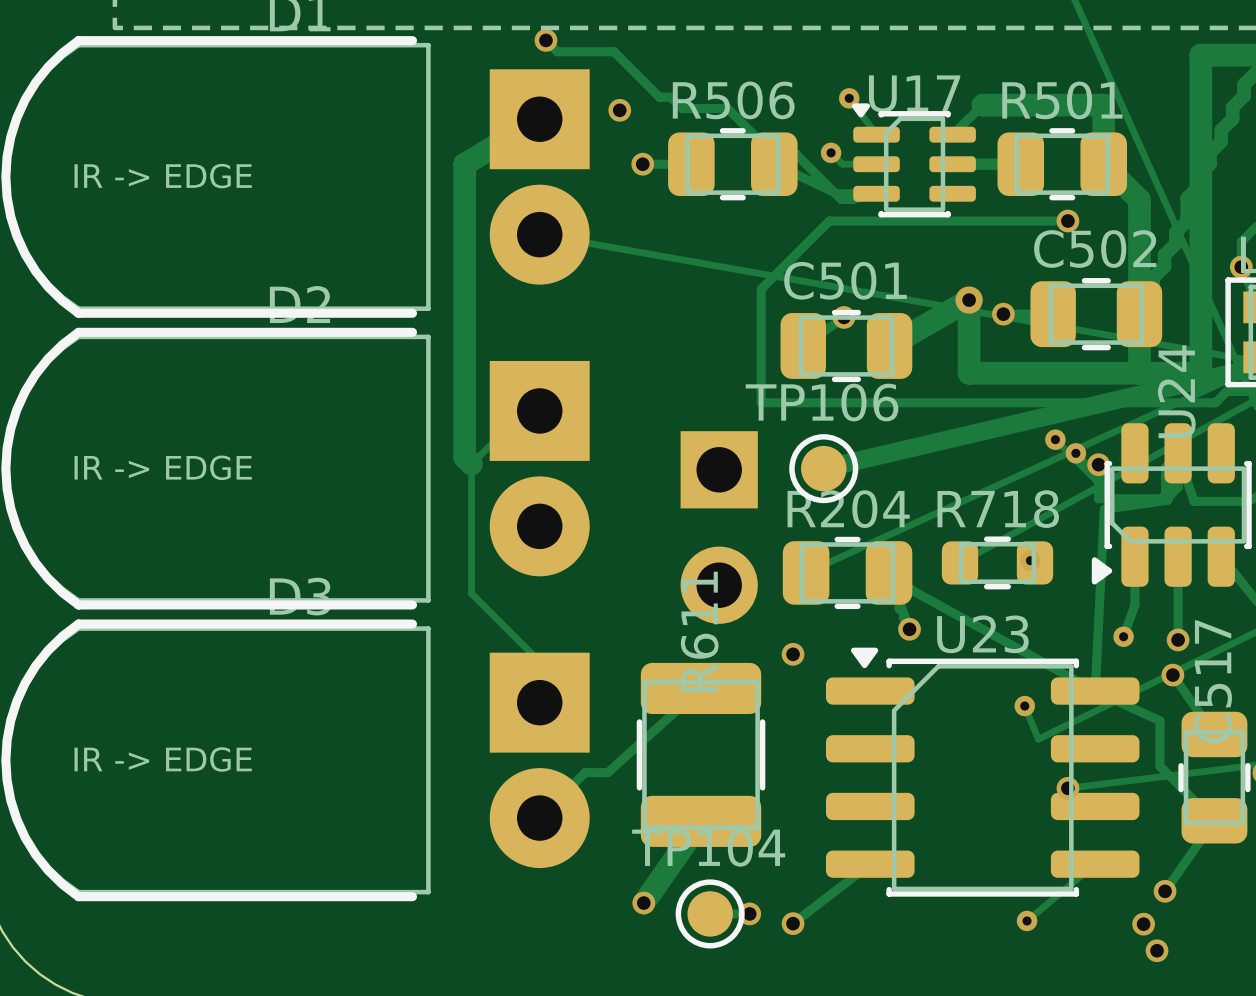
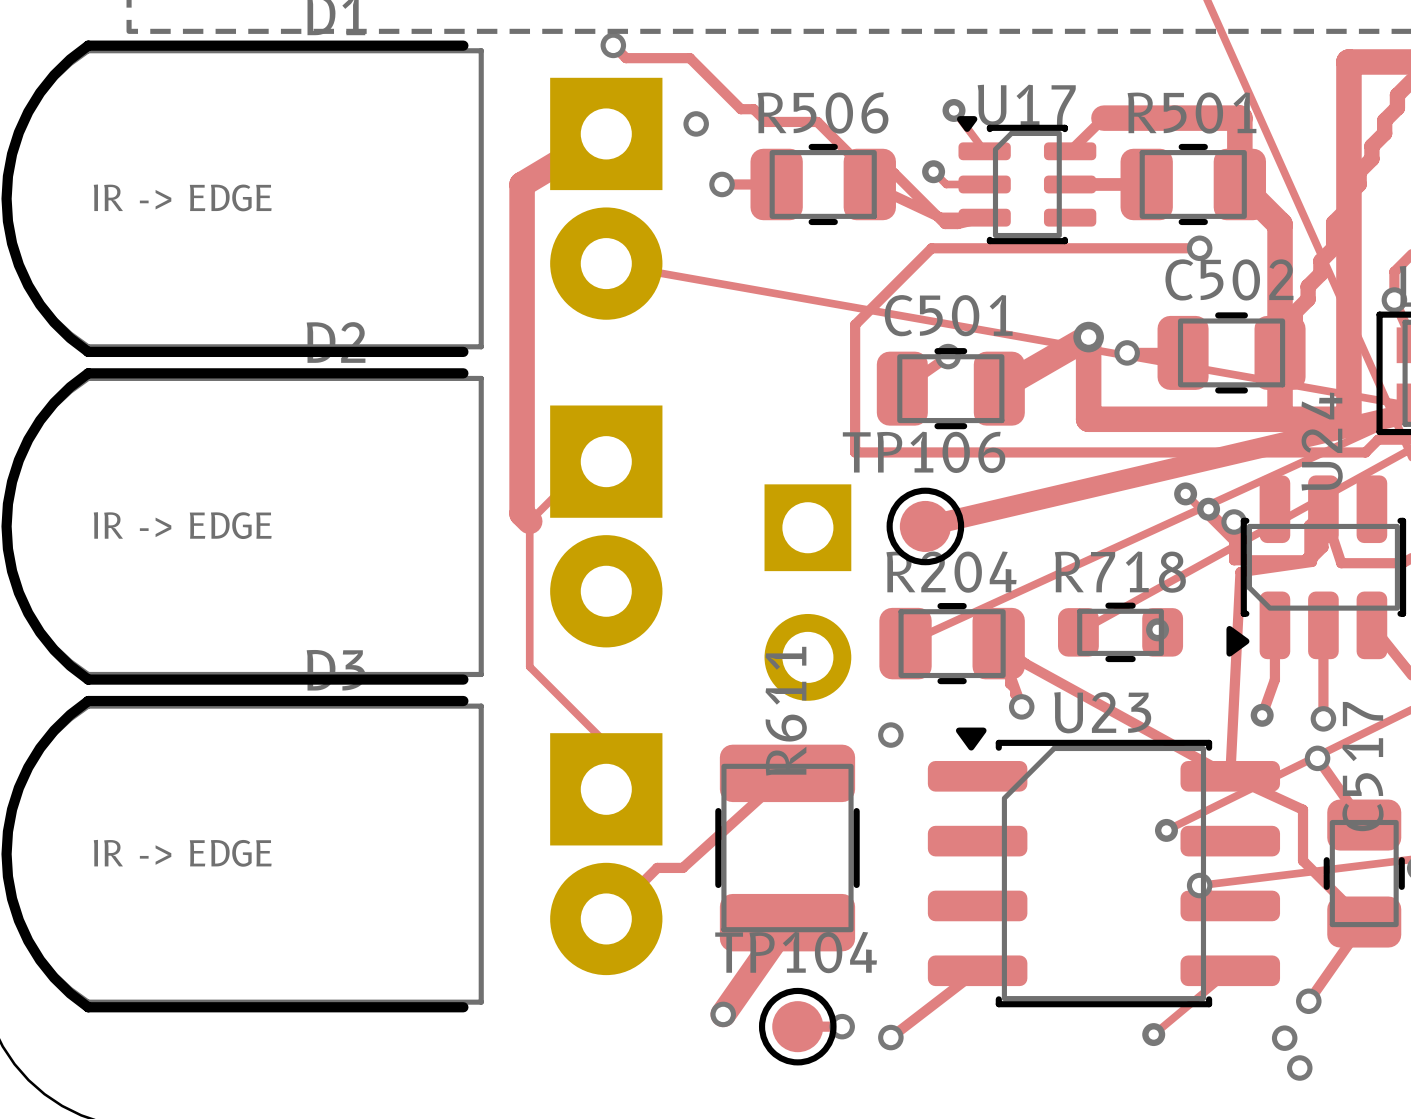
track: (1024, 706) (1038, 739) -> none
via position: (1024, 706) -> (1166, 830)

